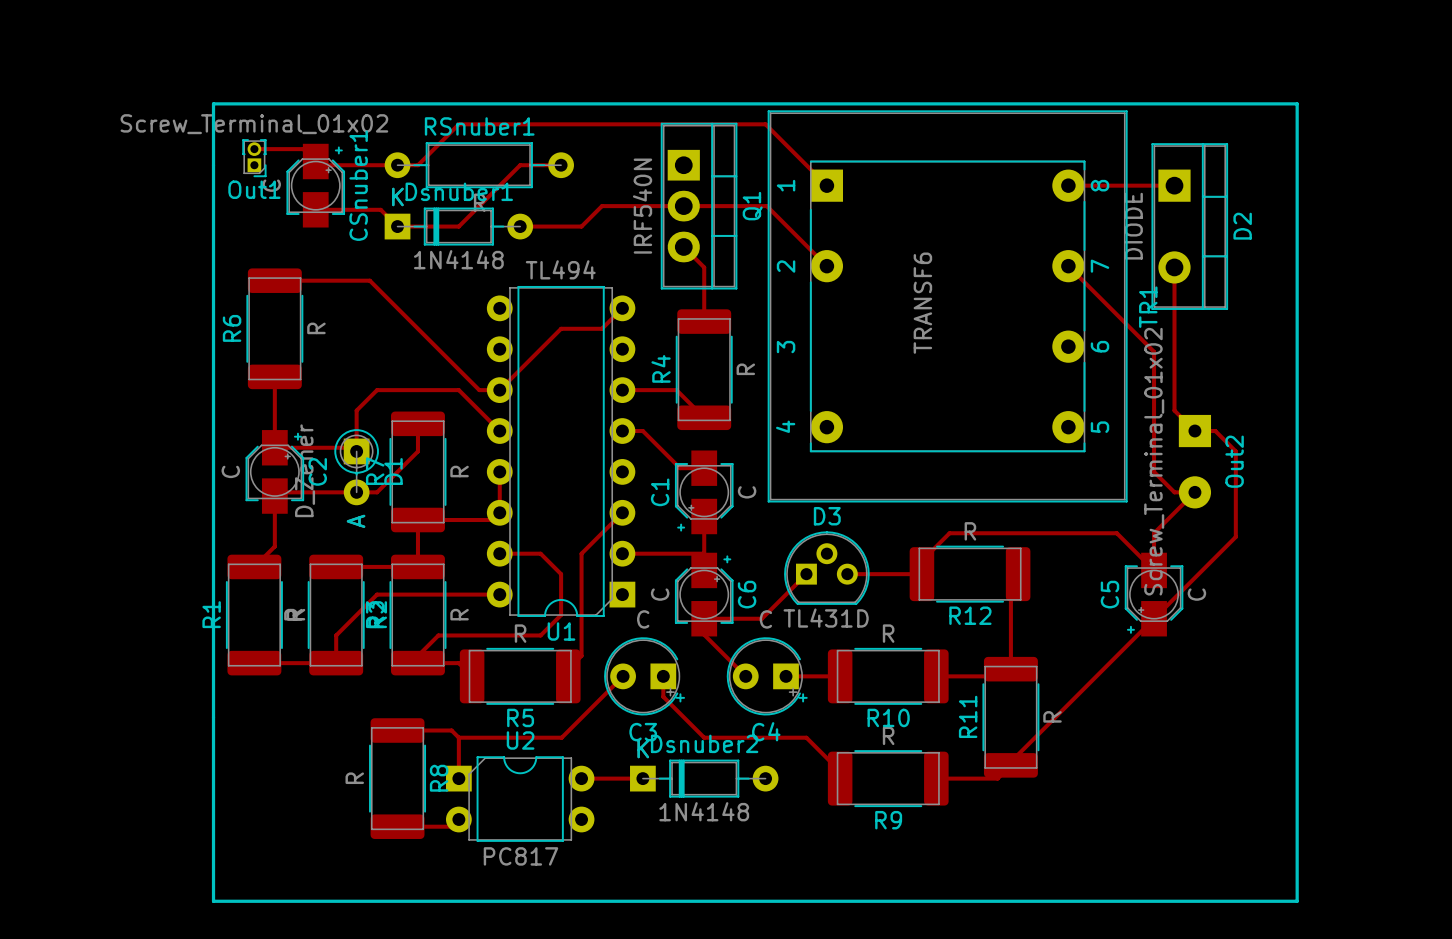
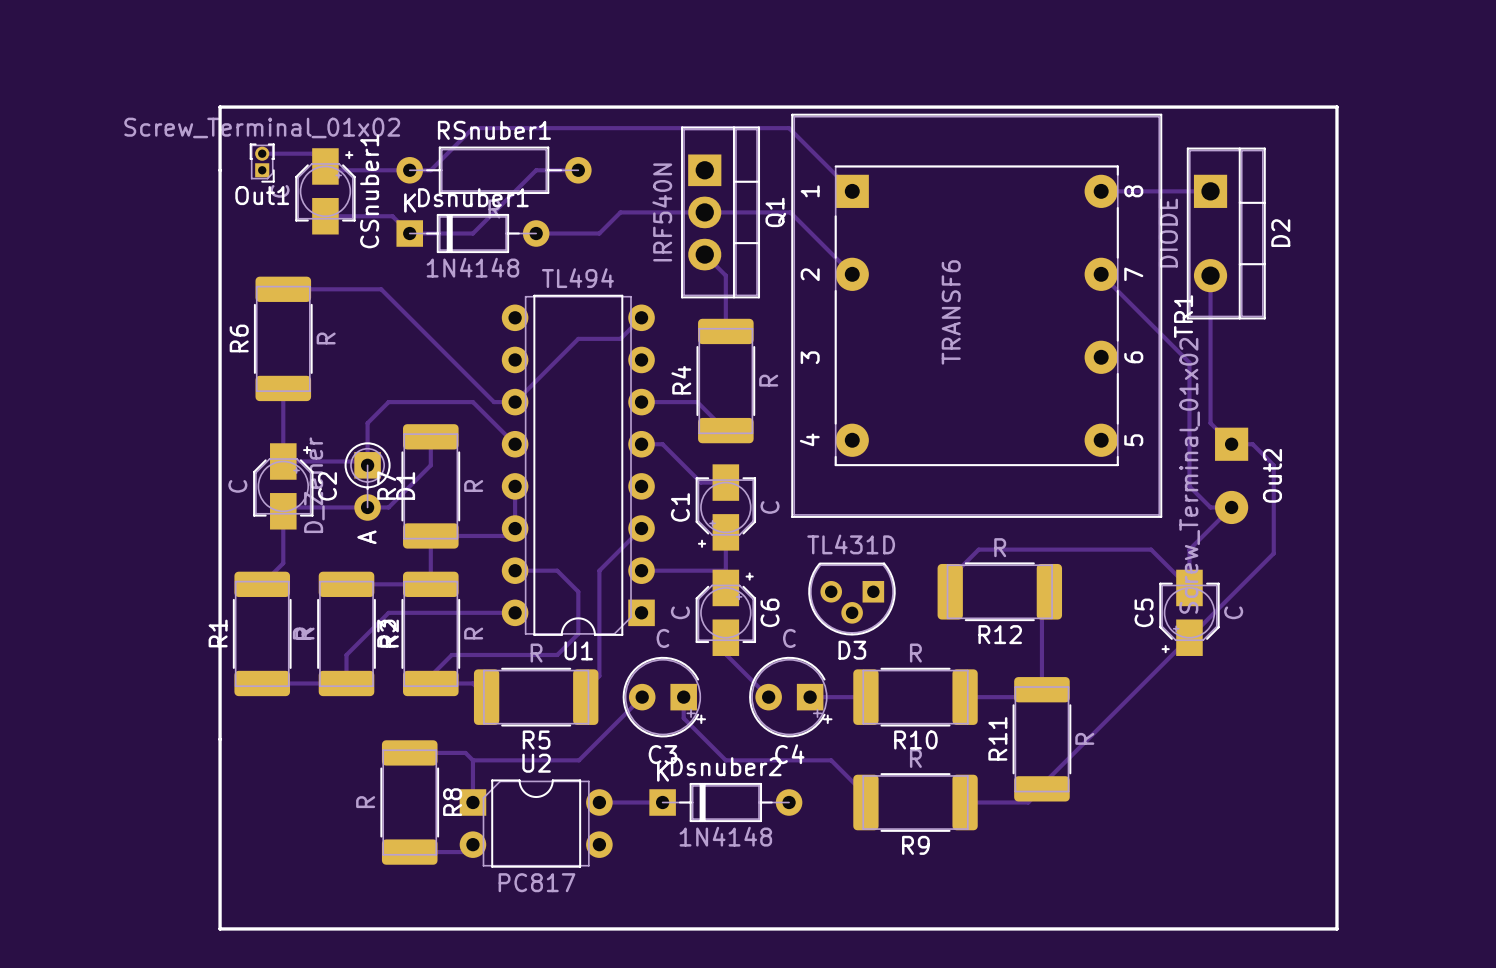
D3 name position: D3 (827, 516) -> D3 (852, 650)
D3 footprint: [784, 531, 870, 605] -> [808, 562, 896, 636]
track: (806, 574) (761, 618) (704, 618) -> none
track: (847, 574) (921, 574) -> none
D3 value position: TL431D (826, 618) -> TL431D (851, 544)

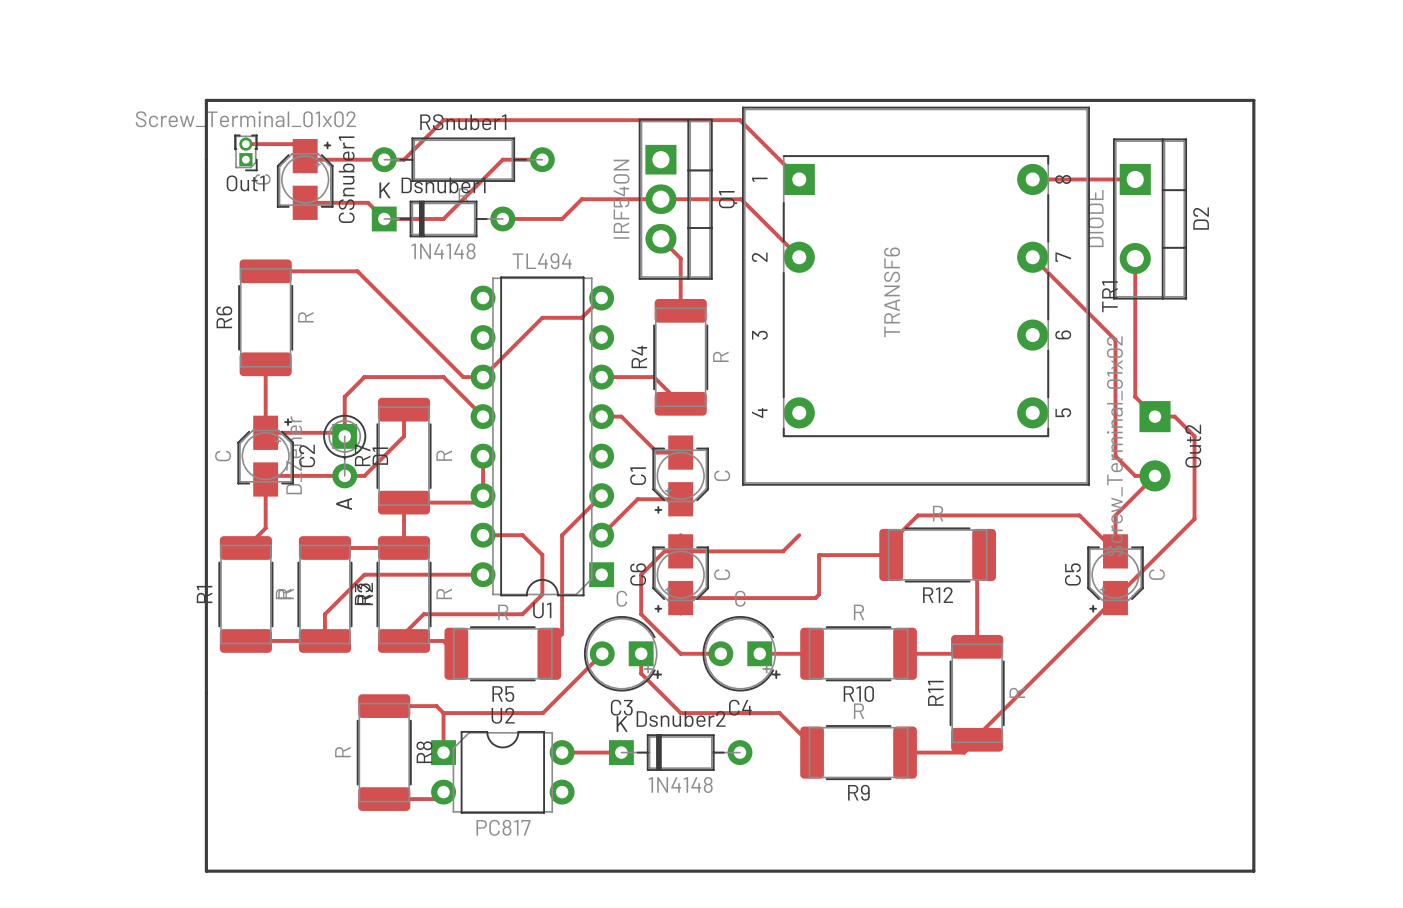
track: (725, 532) (725, 570) (641, 570) -> (680, 499) (637, 499) (601, 535)
track: none -> (890, 555) (819, 555) (819, 594) (815, 598) (680, 598)
D3: TL431D (851, 599) -> none
C6 rotation: 0° (725, 612) -> 180° (680, 574)
track: (725, 654) (768, 697) -> (799, 535) (783, 551) (664, 551) (641, 574) (641, 614) (680, 653) (720, 653)

